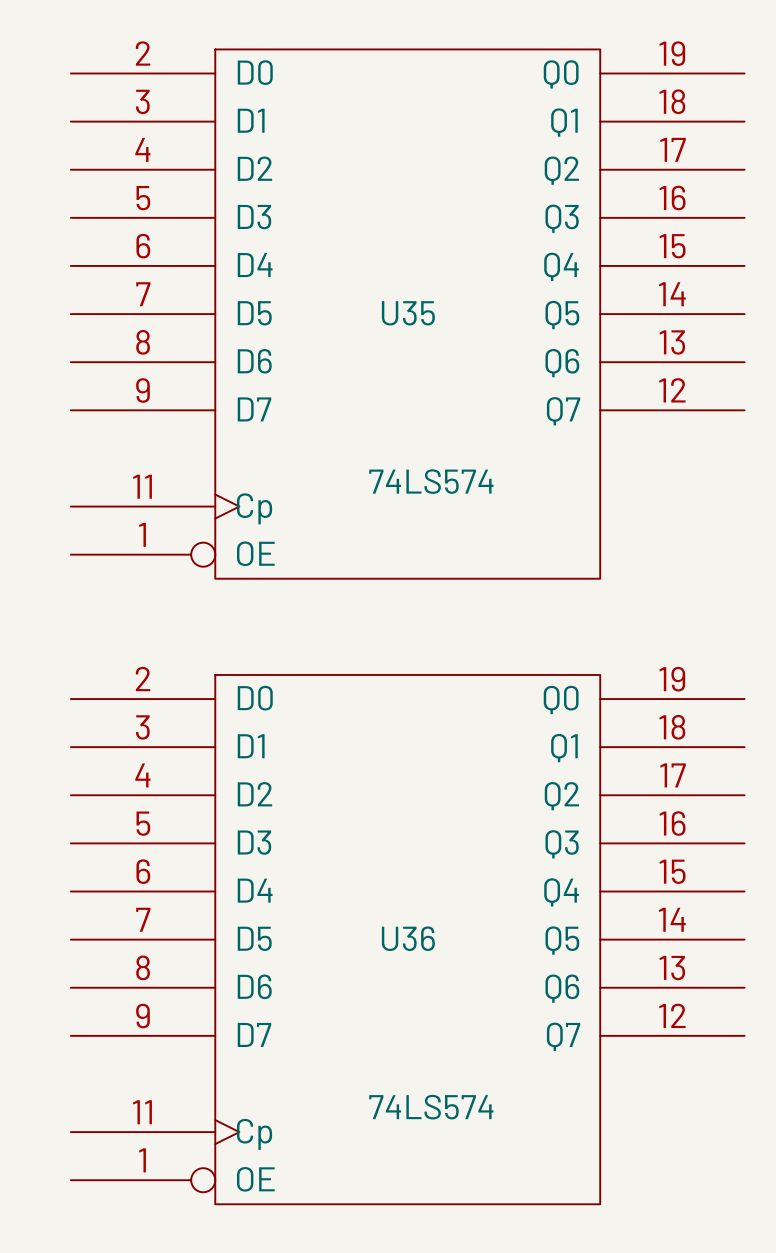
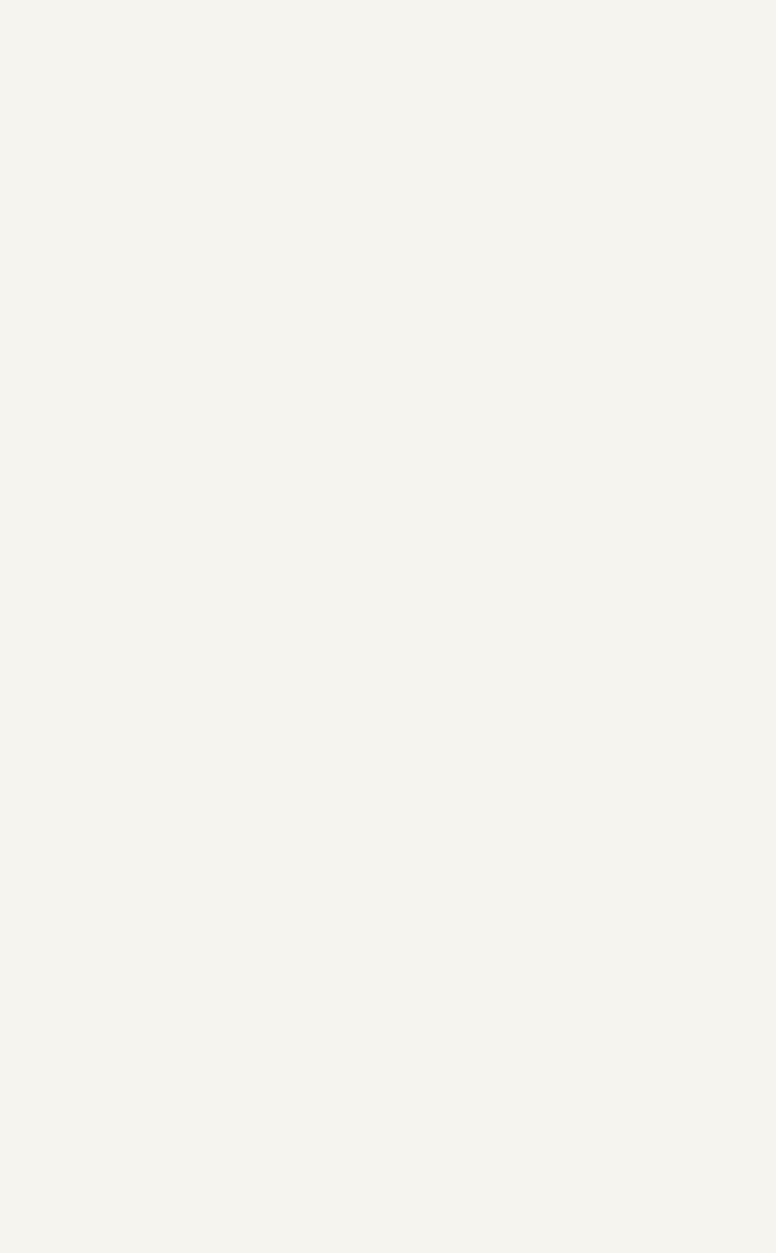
U35: 74LS574 (407, 314) -> none
U36: 74LS574 (407, 939) -> none

